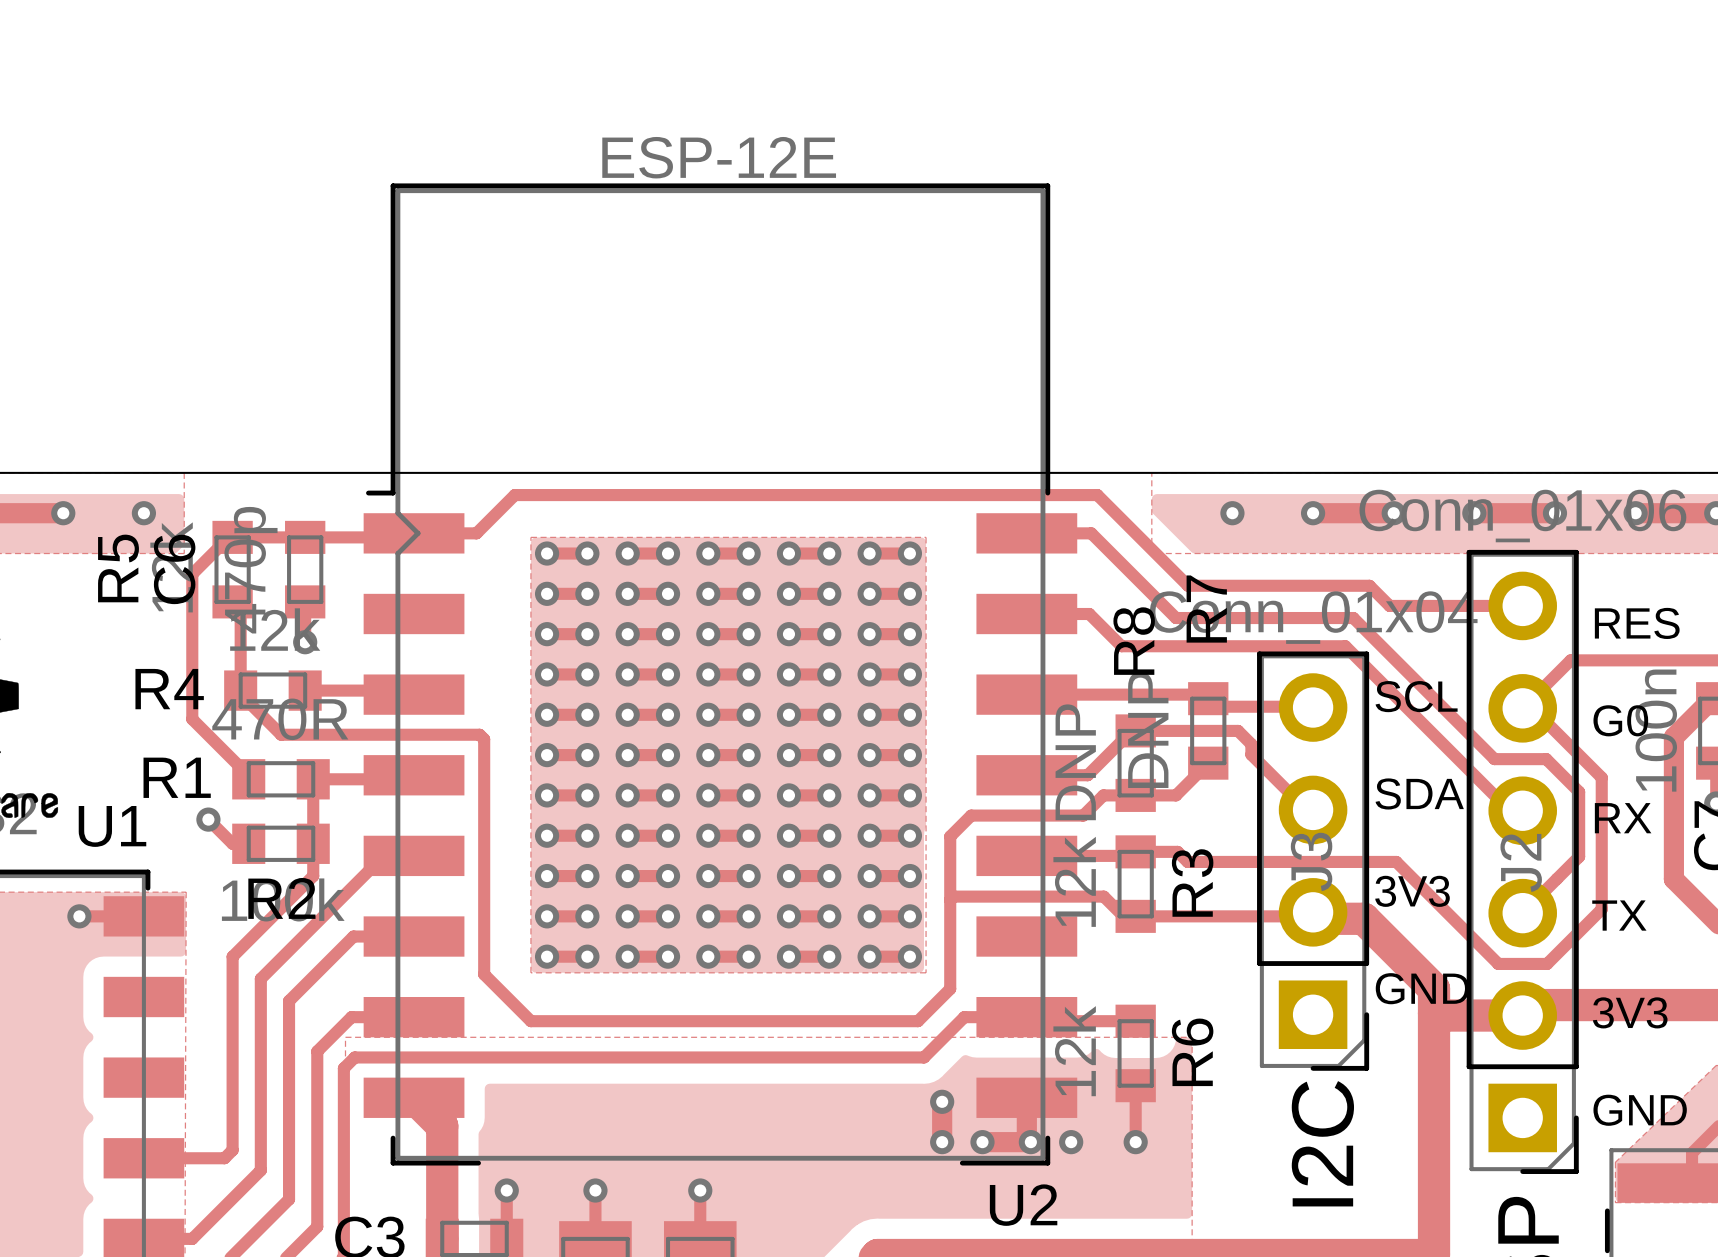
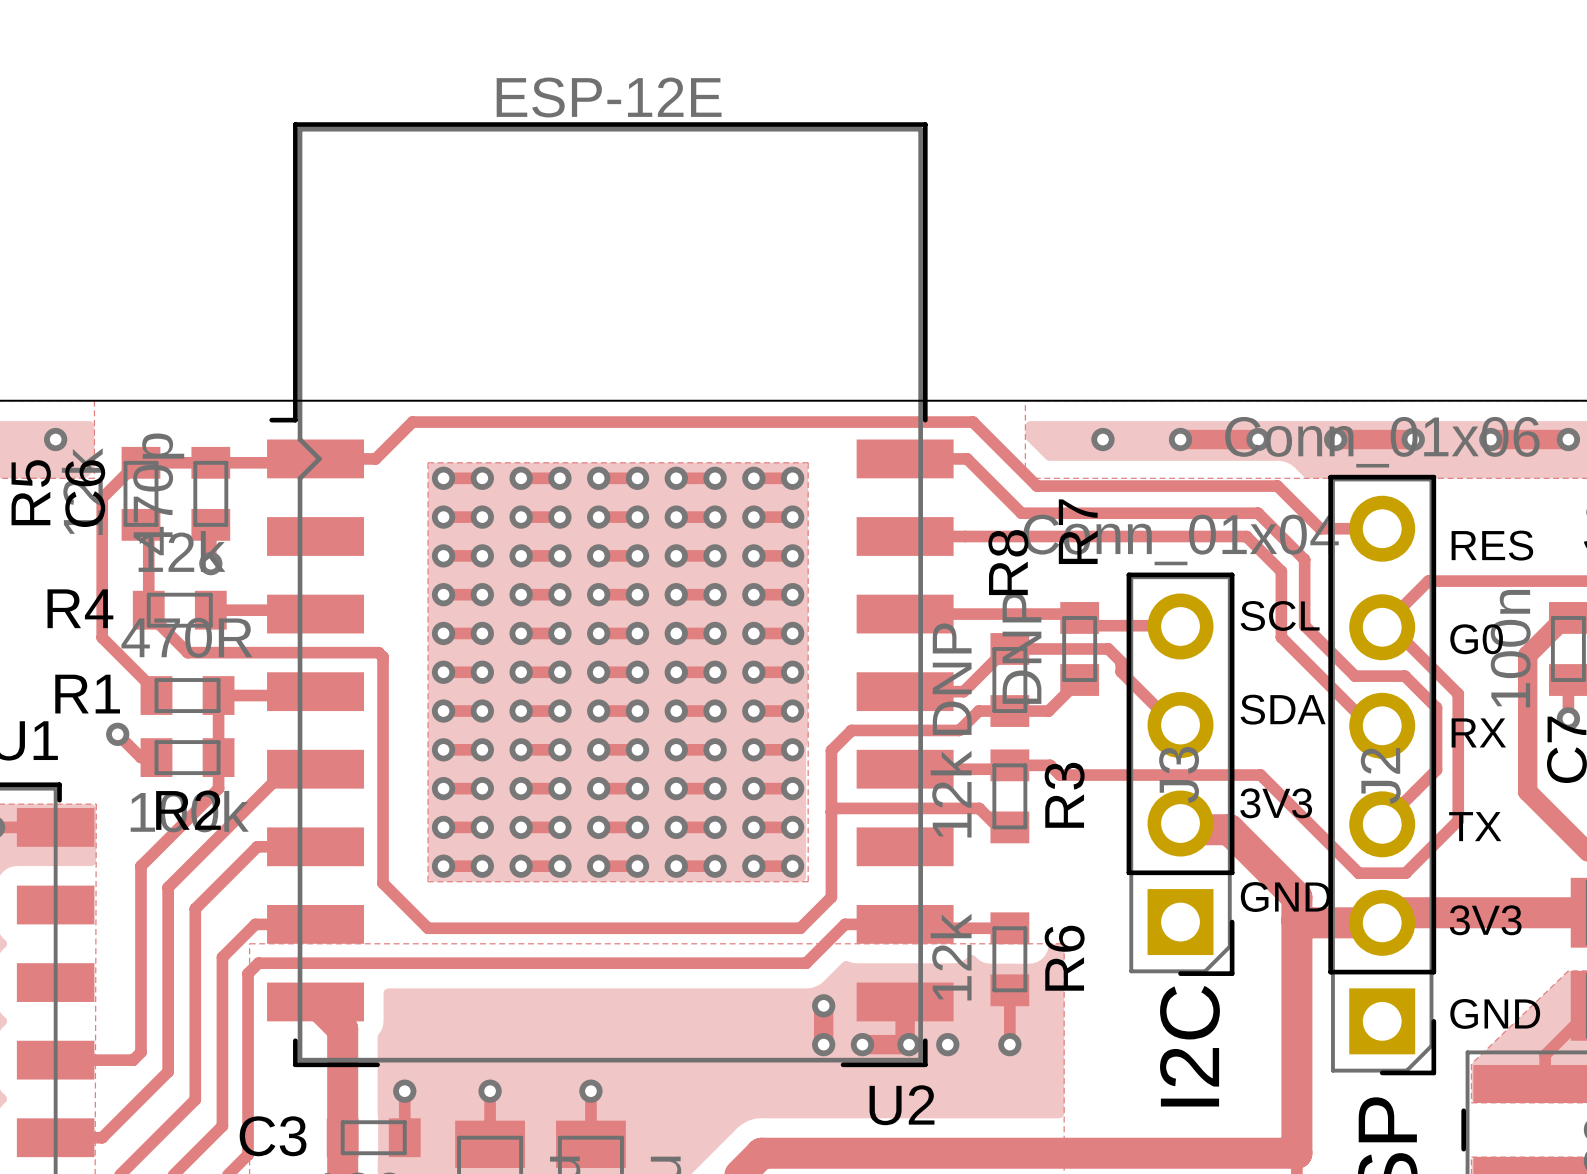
track: (1163, 561) (1188, 585) (1369, 585) (1389, 605) (1458, 605) -> (1037, 486) (1277, 486) (1320, 528)
track: (1147, 589) (1176, 618) (1353, 618) (1442, 706) -> (1021, 513) (1258, 513) (1304, 559) (1304, 625)
track: (1089, 613) (1121, 646) (1345, 646) (1417, 718) -> (965, 536) (1246, 536) (1281, 571) (1281, 637)
track: (1313, 912) (1309, 916) (1135, 916) -> none

